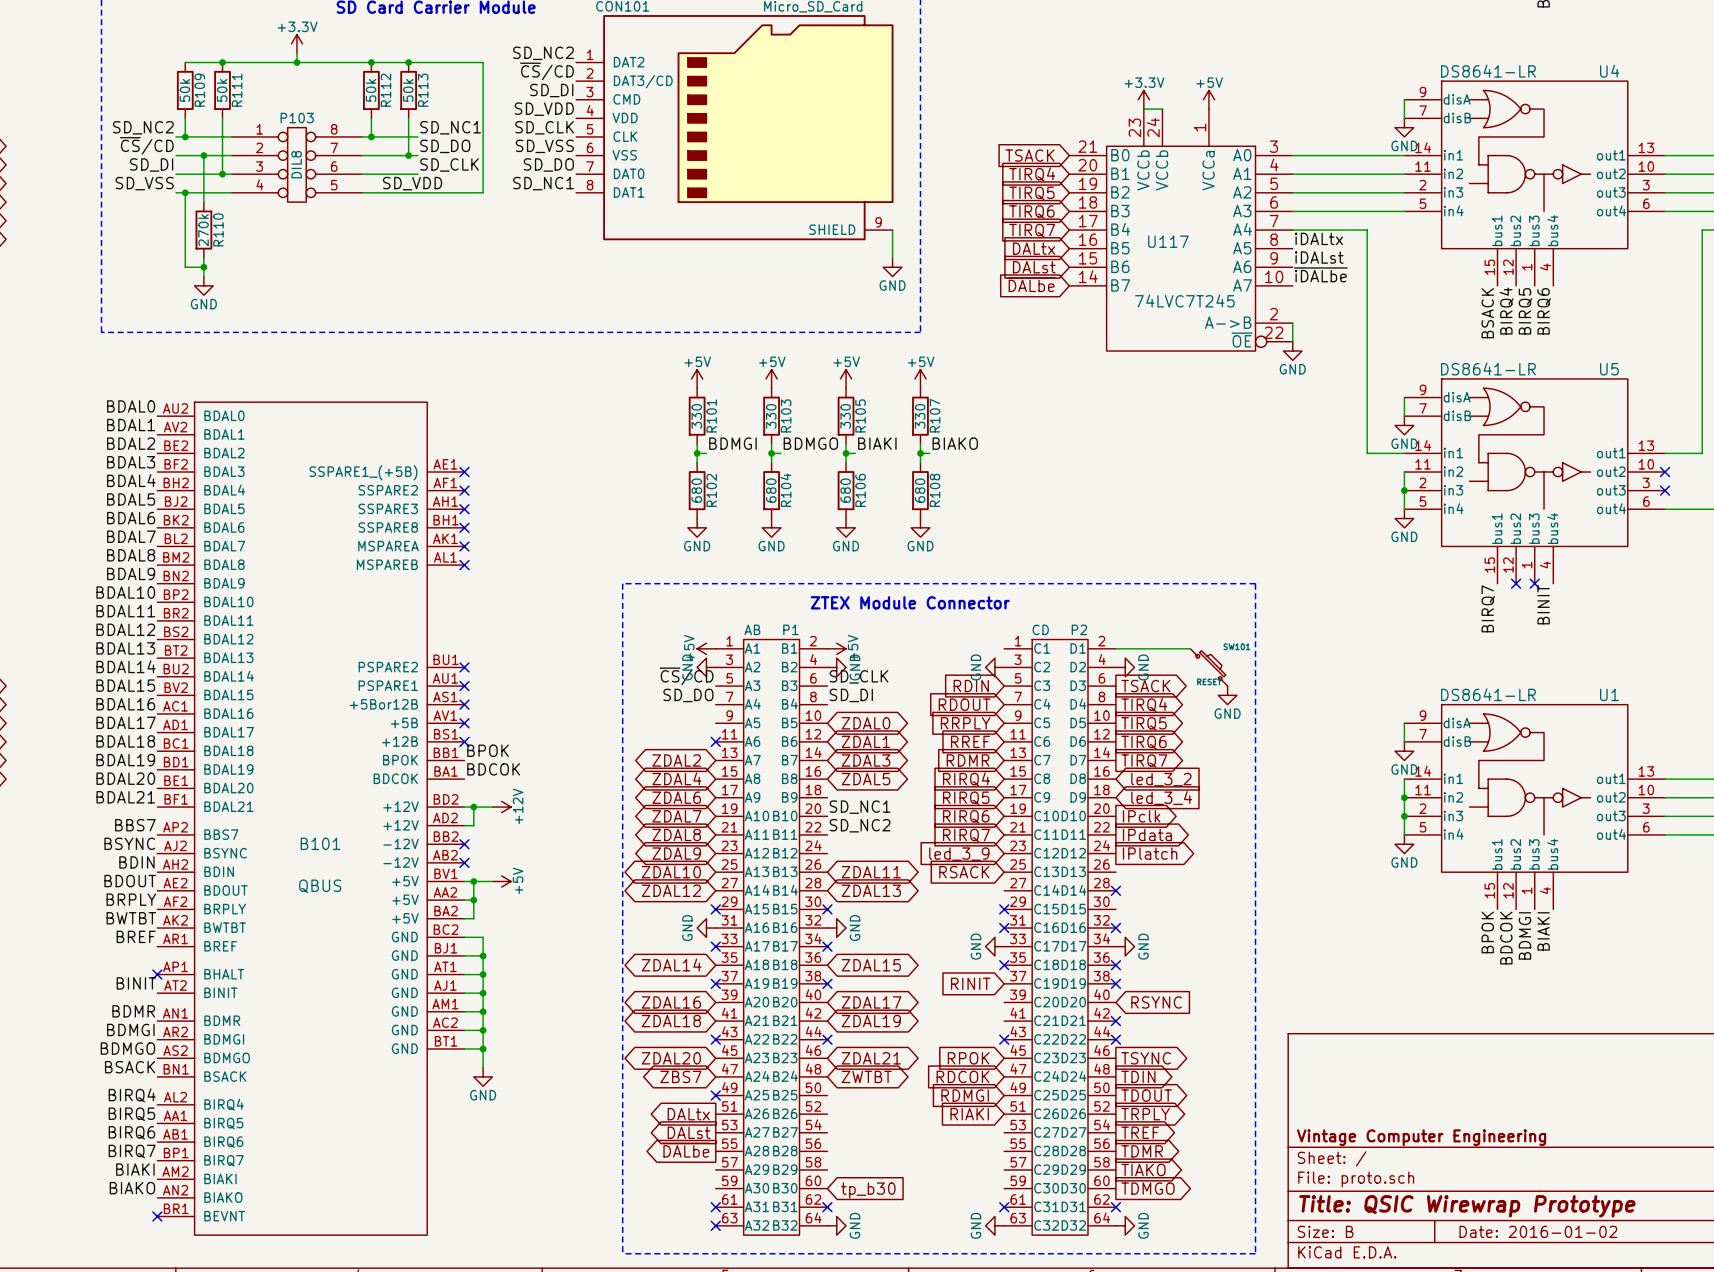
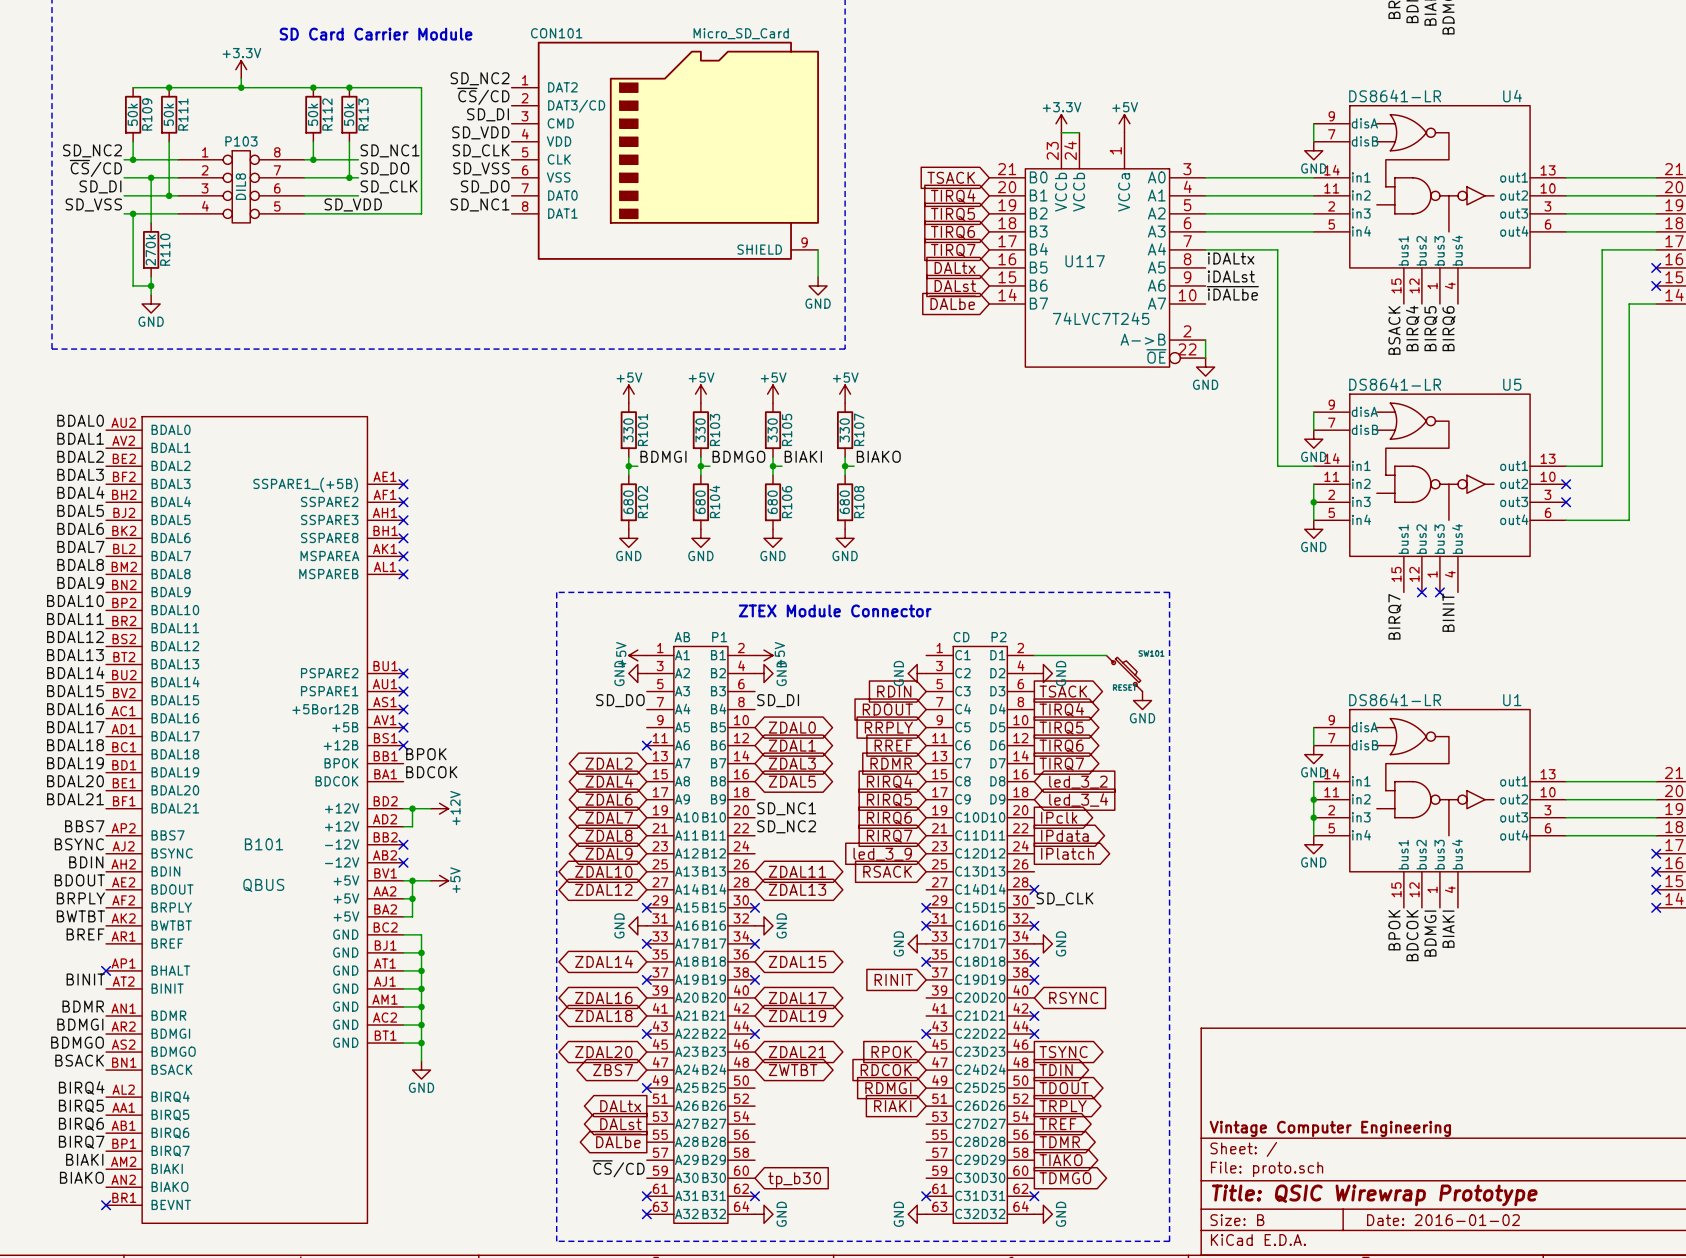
label: ~{CS}/CD (686, 676) -> none
label: SD_CLK (859, 676) -> none
label: none -> SD_CLK (1064, 898)
label: none -> ~{CS}/CD (618, 1168)

